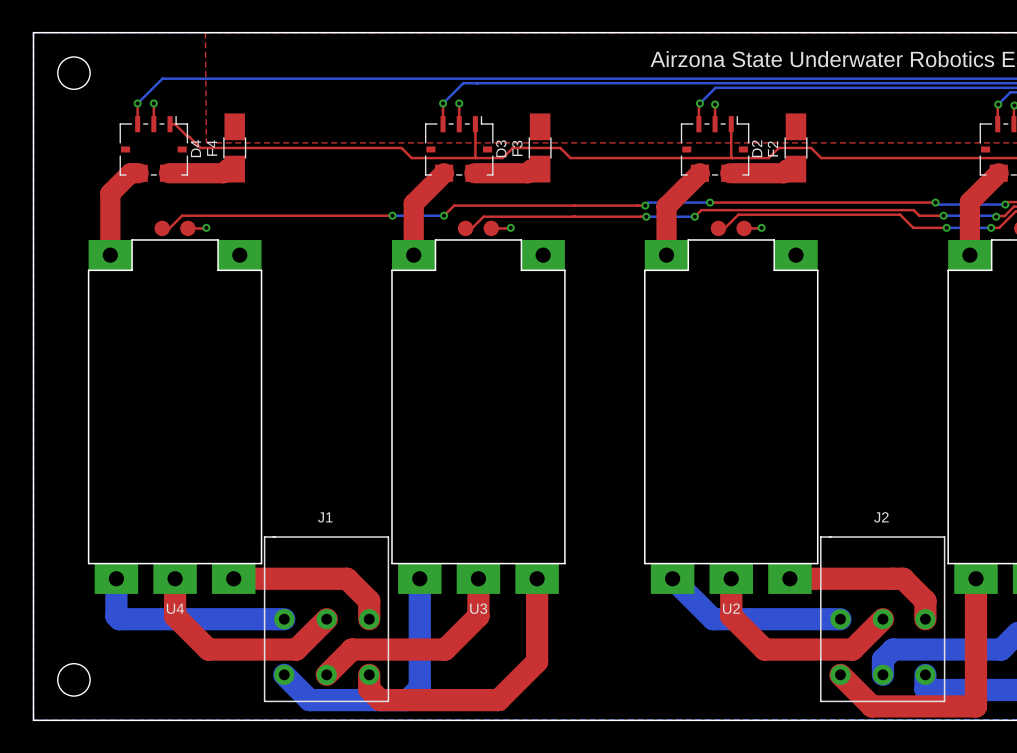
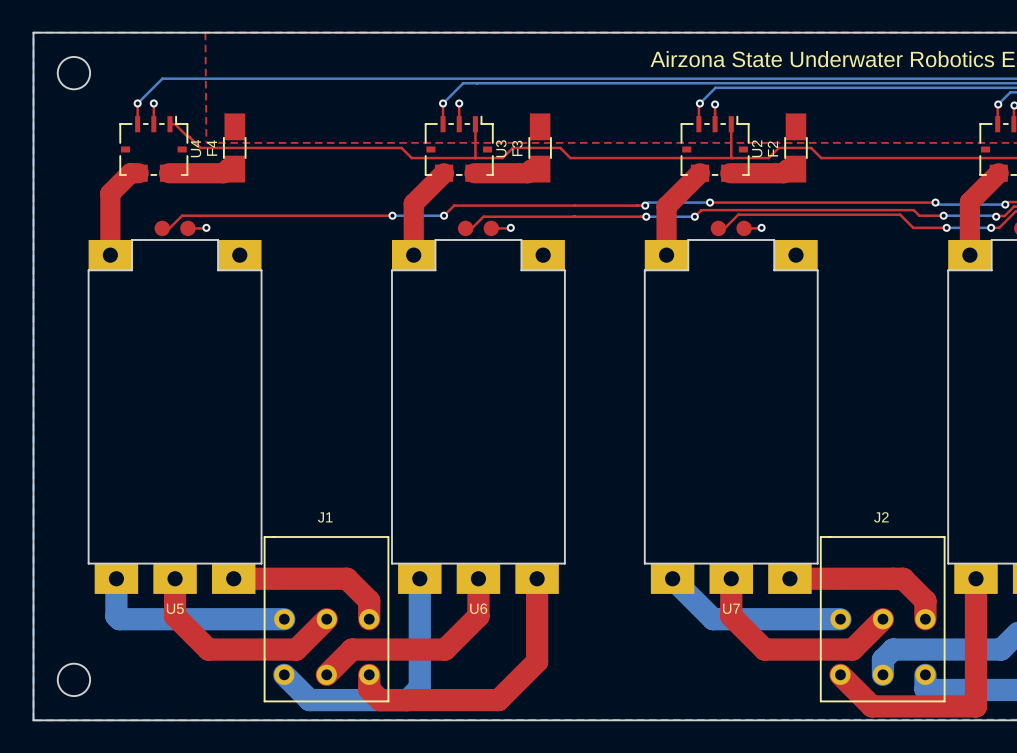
D4 name: D4 (195, 148) -> U4 (196, 148)
D3 name: D3 (501, 148) -> U3 (501, 148)
D2 name: D2 (757, 148) -> U2 (757, 148)
U4 name: U4 (175, 608) -> U5 (175, 608)
U3 name: U3 (478, 608) -> U6 (478, 608)
U2 name: U2 (731, 608) -> U7 (731, 608)

